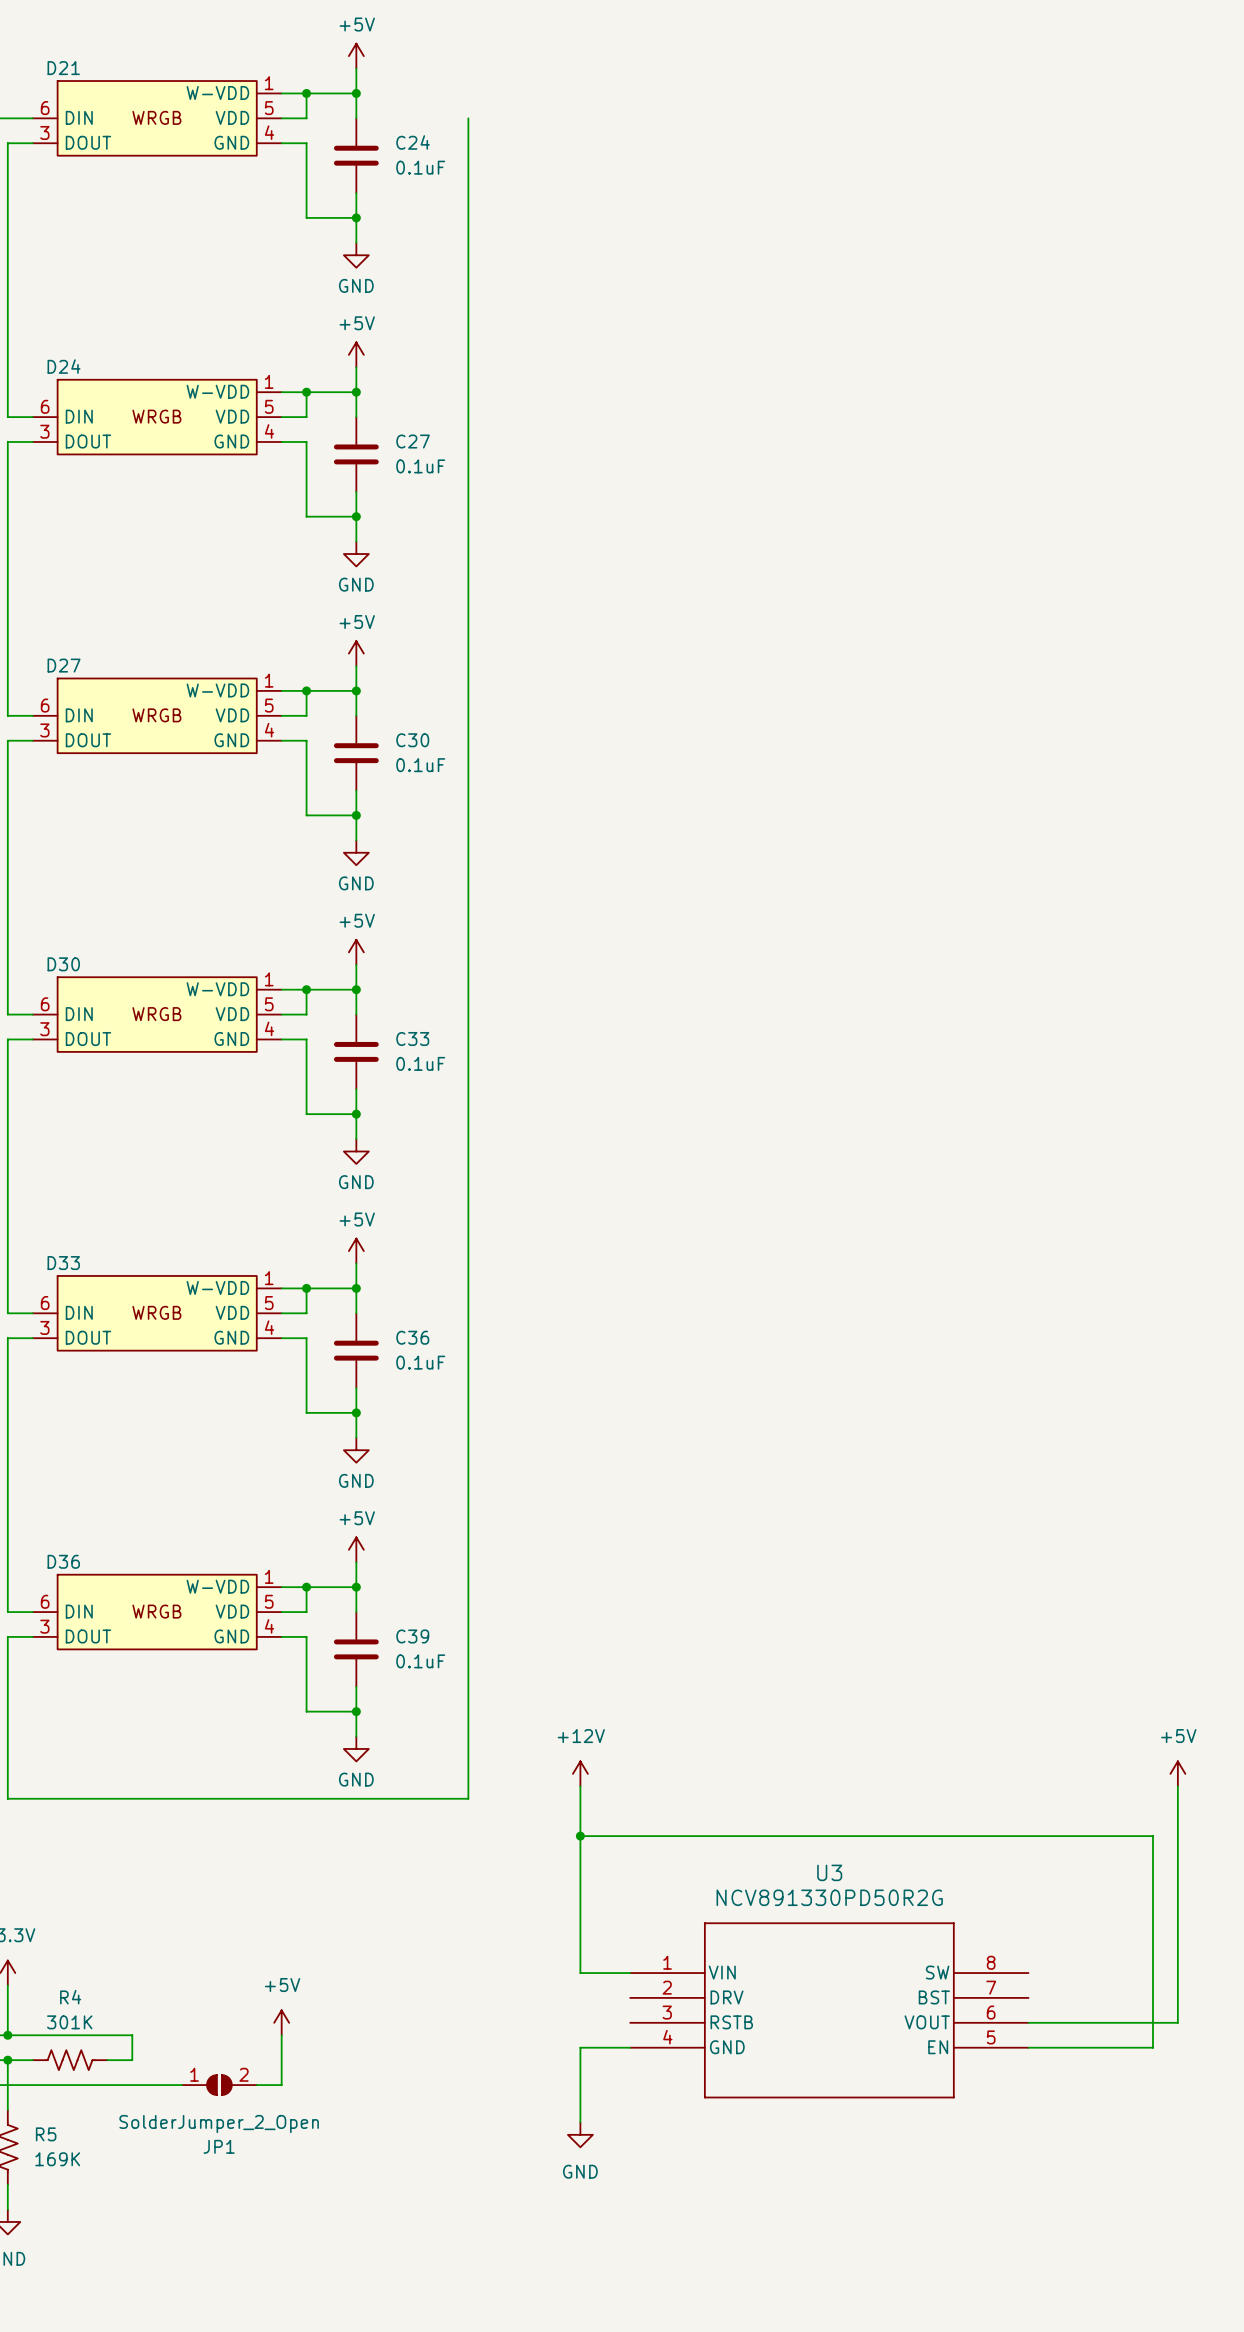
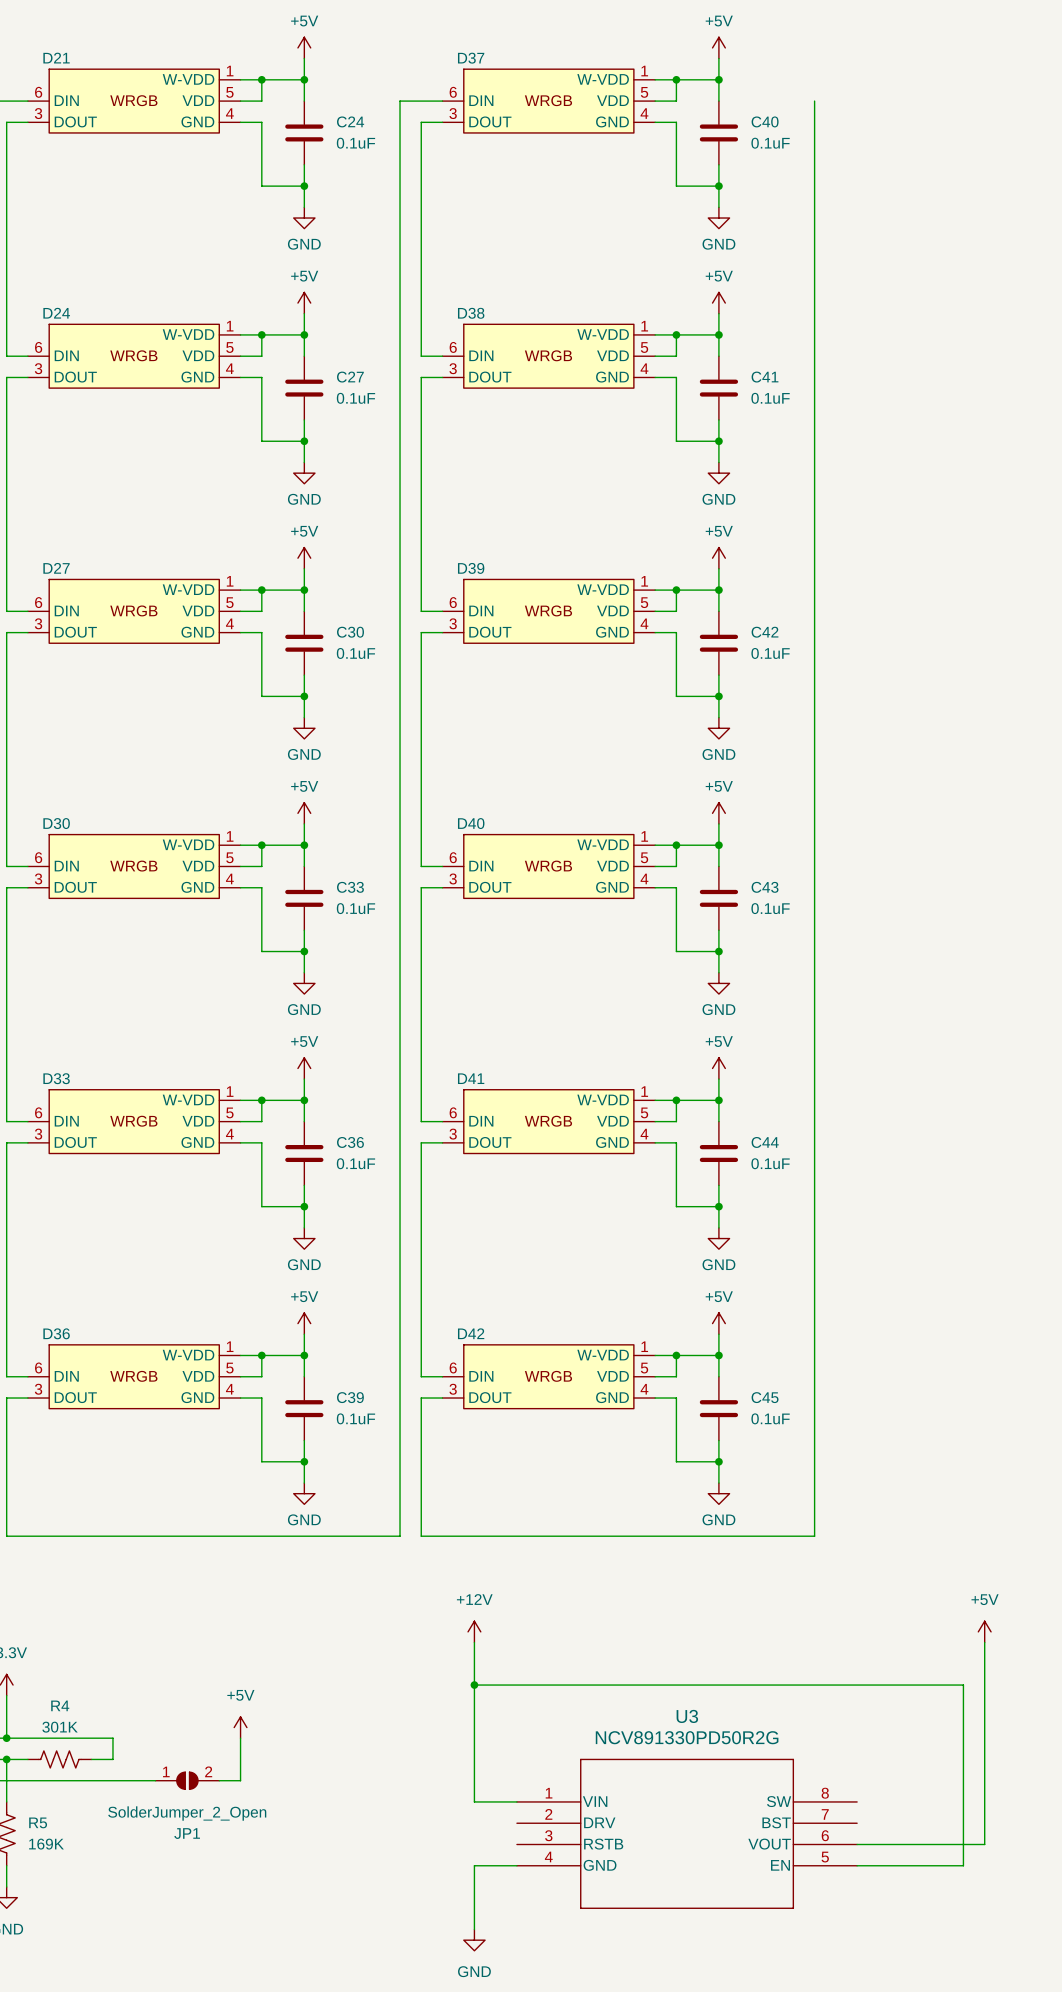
power symbol: none -> +5V (718, 47)
wire: none -> (718, 58) (718, 101)
wire: none -> (655, 79) (718, 79)
wire: none -> (676, 79) (676, 101) (655, 101)
junction: none -> (676, 79)
junction: none -> (718, 79)
wire: none -> (400, 101) (442, 101)
D37: none -> (548, 101)
wire: none -> (814, 101) (814, 1536) (421, 1536) (421, 1398) (442, 1398)
wire: none -> (442, 122) (421, 122) (421, 356) (442, 356)
wire: none -> (655, 122) (676, 122) (676, 186) (718, 186)
C40: none -> 0.1uF (718, 132)
wire: none -> (718, 164) (718, 207)
junction: none -> (718, 186)
power symbol: none -> GND (718, 218)
power symbol: none -> +5V (718, 303)
wire: none -> (718, 313) (718, 356)
wire: none -> (655, 334) (718, 334)
wire: none -> (676, 334) (676, 356) (655, 356)
junction: none -> (676, 334)
junction: none -> (718, 334)
D38: none -> (548, 356)
wire: none -> (442, 377) (421, 377) (421, 611) (442, 611)
wire: none -> (655, 377) (676, 377) (676, 441) (718, 441)
C41: none -> 0.1uF (718, 388)
wire: none -> (718, 419) (718, 462)
junction: none -> (718, 441)
power symbol: none -> GND (718, 473)
power symbol: none -> +5V (718, 558)
wire: none -> (718, 568) (718, 611)
wire: none -> (655, 590) (718, 590)
wire: none -> (676, 590) (676, 611) (655, 611)
junction: none -> (676, 590)
junction: none -> (718, 590)
D39: none -> (548, 611)
wire: none -> (442, 632) (421, 632) (421, 866) (442, 866)
wire: none -> (655, 632) (676, 632) (676, 696) (718, 696)
C42: none -> 0.1uF (718, 643)
wire: none -> (718, 675) (718, 717)
junction: none -> (718, 696)
power symbol: none -> GND (718, 728)
power symbol: none -> +5V (718, 813)
wire: none -> (718, 823) (718, 866)
wire: none -> (655, 845) (718, 845)
wire: none -> (676, 845) (676, 866) (655, 866)
junction: none -> (676, 845)
junction: none -> (718, 845)
D40: none -> (548, 866)
wire: none -> (442, 887) (421, 887) (421, 1121) (442, 1121)
wire: none -> (655, 887) (676, 887) (676, 951) (718, 951)
C43: none -> 0.1uF (718, 898)
wire: none -> (718, 930) (718, 972)
junction: none -> (718, 951)
power symbol: none -> GND (718, 983)
power symbol: none -> +5V (718, 1068)
wire: none -> (718, 1079) (718, 1121)
wire: none -> (655, 1100) (718, 1100)
wire: none -> (676, 1100) (676, 1121) (655, 1121)
junction: none -> (676, 1100)
junction: none -> (718, 1100)
D41: none -> (548, 1121)
wire: none -> (442, 1142) (421, 1142) (421, 1376) (442, 1376)
wire: none -> (655, 1142) (676, 1142) (676, 1206) (718, 1206)
C44: none -> 0.1uF (718, 1153)
wire: none -> (718, 1185) (718, 1227)
junction: none -> (718, 1206)
power symbol: none -> GND (718, 1238)
power symbol: none -> +5V (718, 1323)
wire: none -> (718, 1334) (718, 1376)
wire: none -> (655, 1355) (718, 1355)
wire: none -> (676, 1355) (676, 1376) (655, 1376)
junction: none -> (676, 1355)
junction: none -> (718, 1355)
D42: none -> (548, 1376)
wire: none -> (655, 1398) (676, 1398) (676, 1461) (718, 1461)
C45: none -> 0.1uF (718, 1408)
wire: none -> (718, 1440) (718, 1483)
junction: none -> (718, 1461)
power symbol: none -> GND (718, 1493)
power symbol position: +12V (580, 1773) -> +12V (474, 1631)
power symbol position: +5V (1177, 1773) -> +5V (984, 1631)
wire: (580, 1786) (580, 1973) -> (474, 1685) (495, 1685)
wire: (1177, 1786) (1177, 2022) (1028, 2022) -> none
wire: (580, 1836) (1152, 1836) (1152, 1923) -> none
junction: (580, 1836) -> none
wire: none -> (474, 1642) (474, 1801) (516, 1801)
junction: none -> (474, 1685)
wire: none -> (538, 1685) (963, 1685) (963, 1865) (857, 1865)
U3 position: (829, 2010) -> (687, 1833)
wire: (630, 2047) (580, 2047) (580, 2122) -> (516, 1865) (474, 1865) (474, 1929)
wire: (1028, 2047) (1152, 2047) -> (857, 1844) (984, 1844) (984, 1748)
power symbol position: GND (580, 2134) -> GND (474, 1940)

